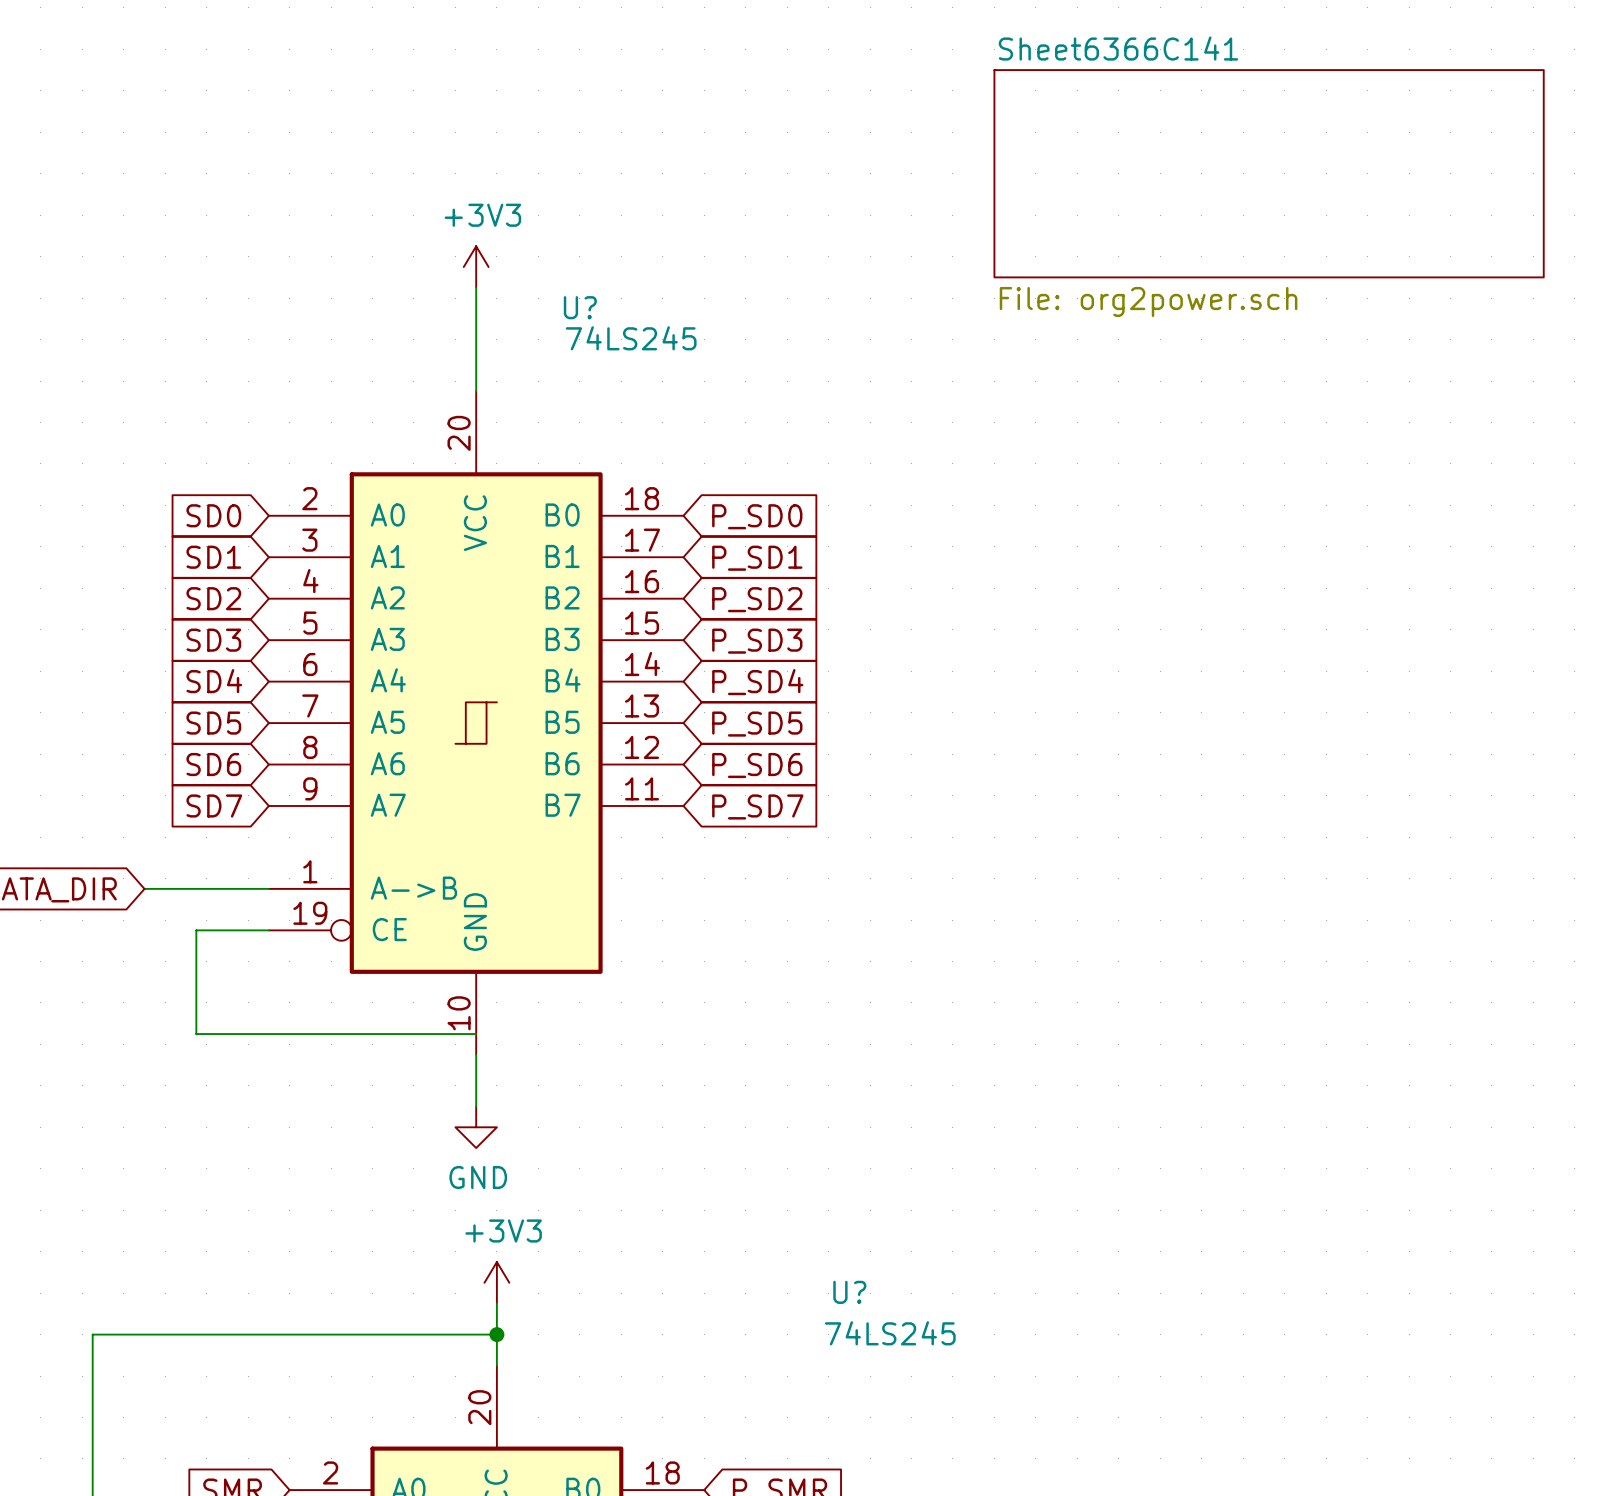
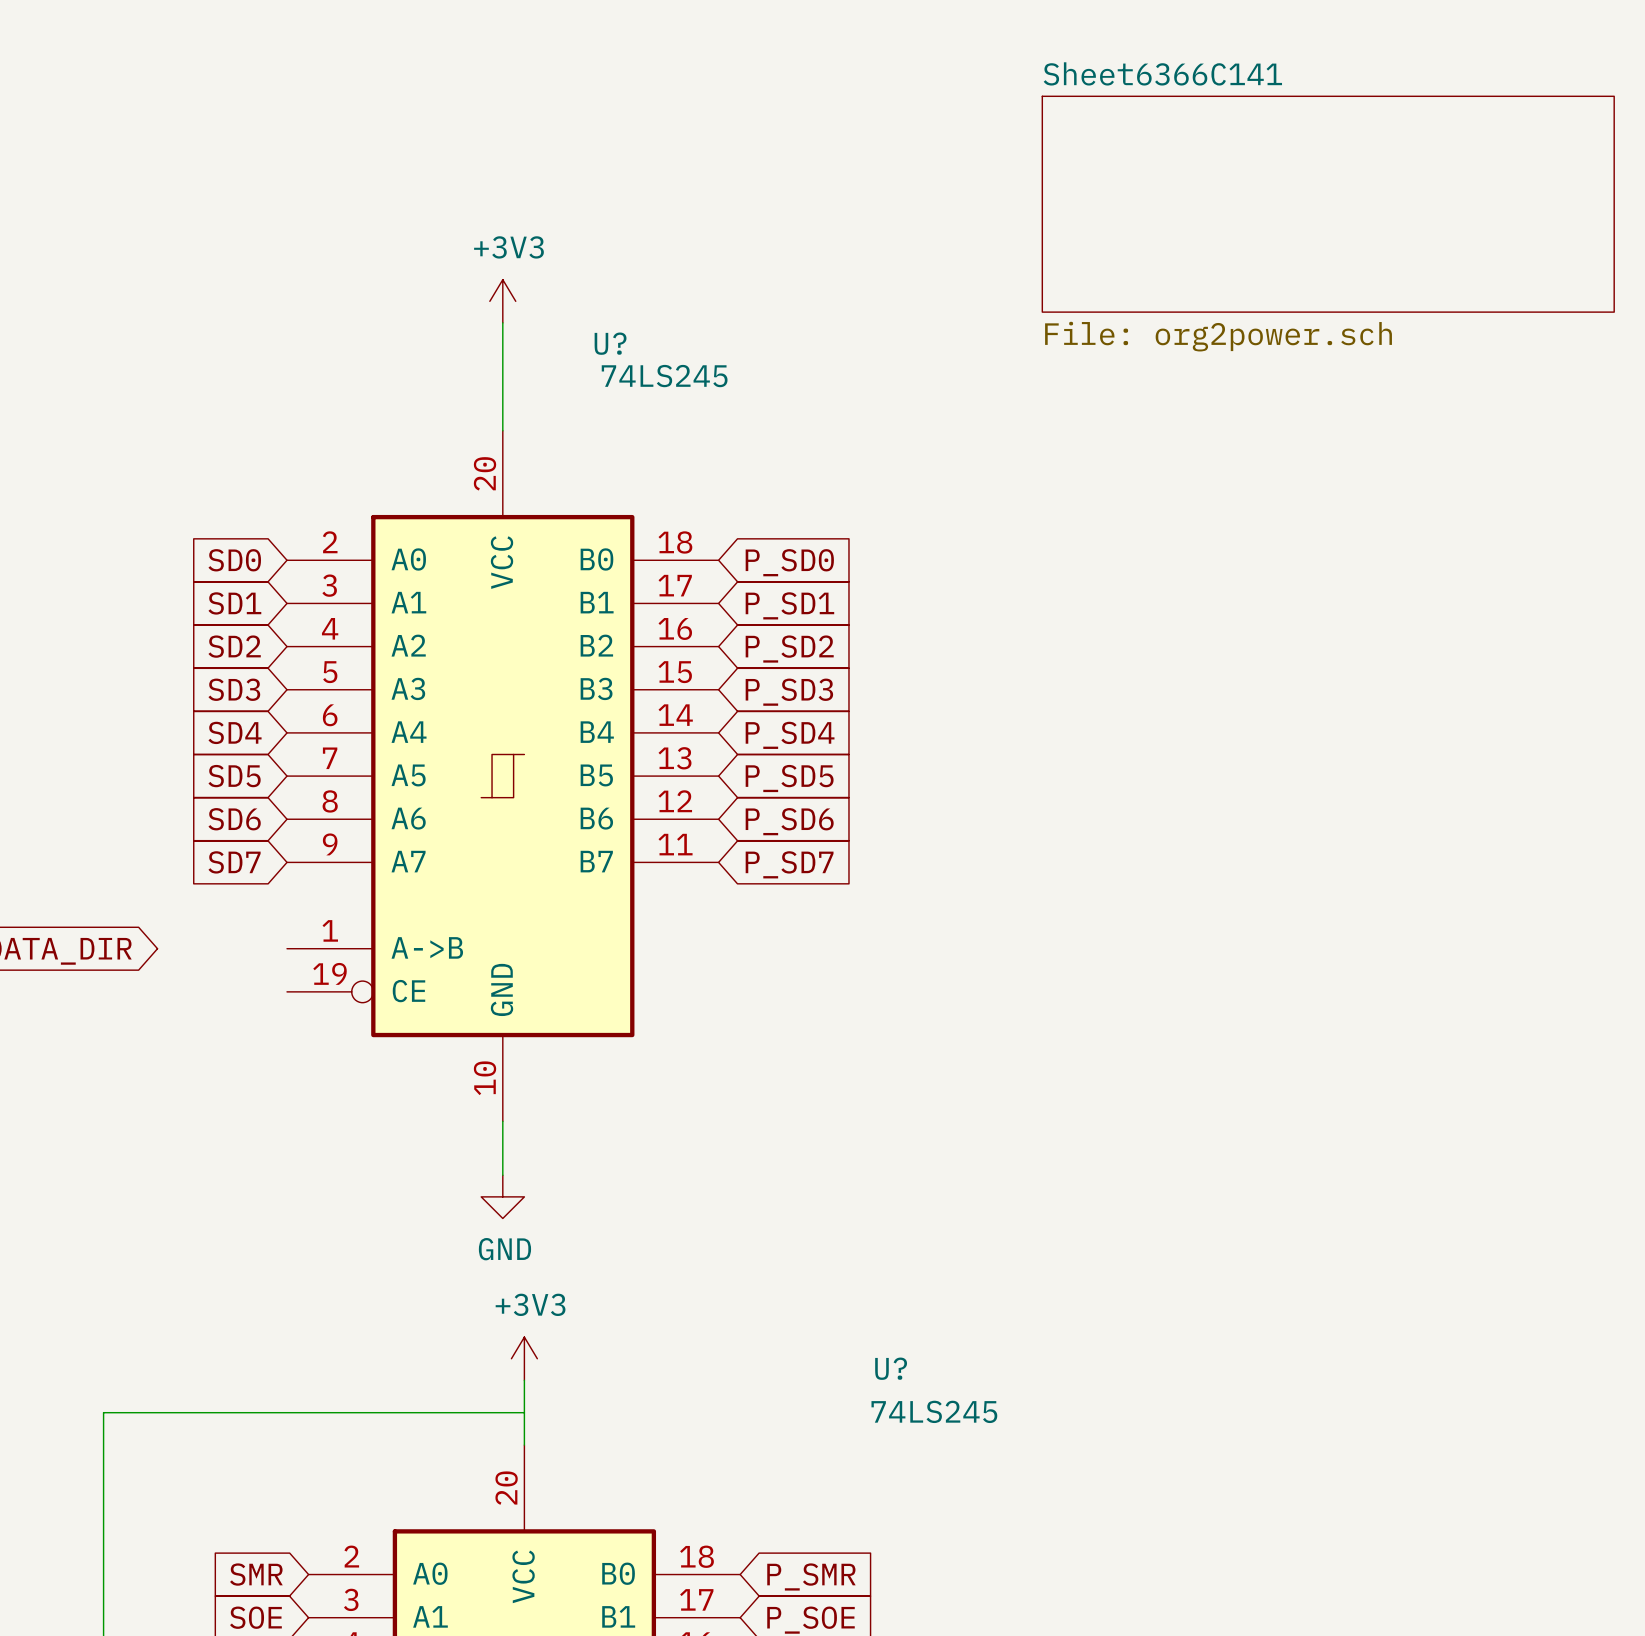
wire: (144, 888) (268, 888) -> none
wire: (268, 930) (196, 930) (196, 1034) (476, 1034) -> none
junction: (496, 1334) -> none

